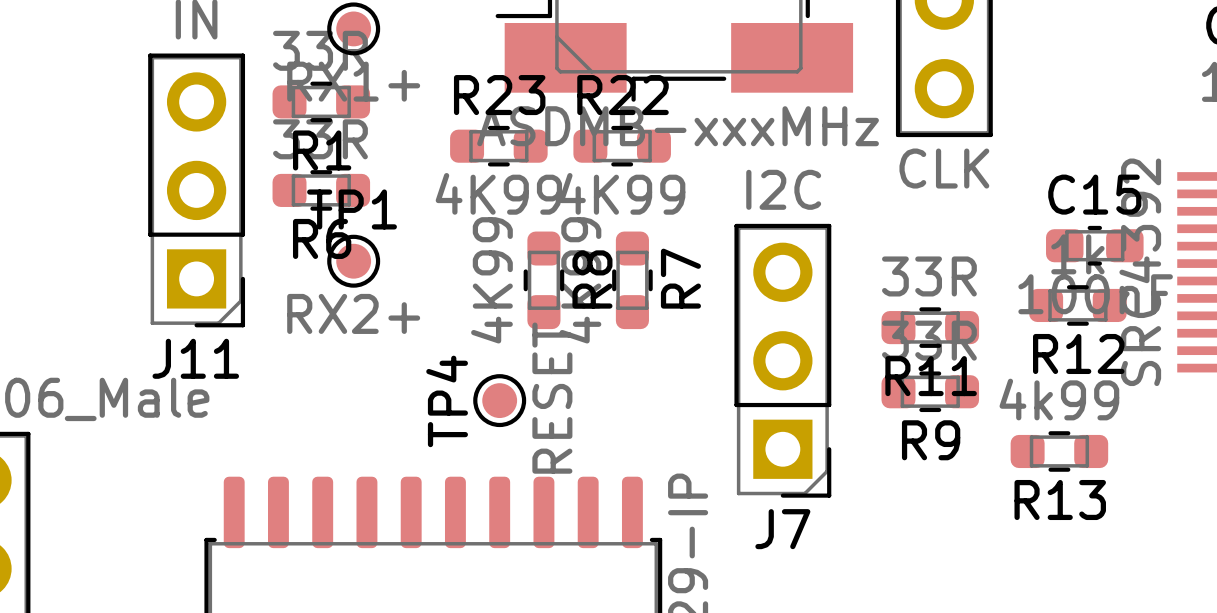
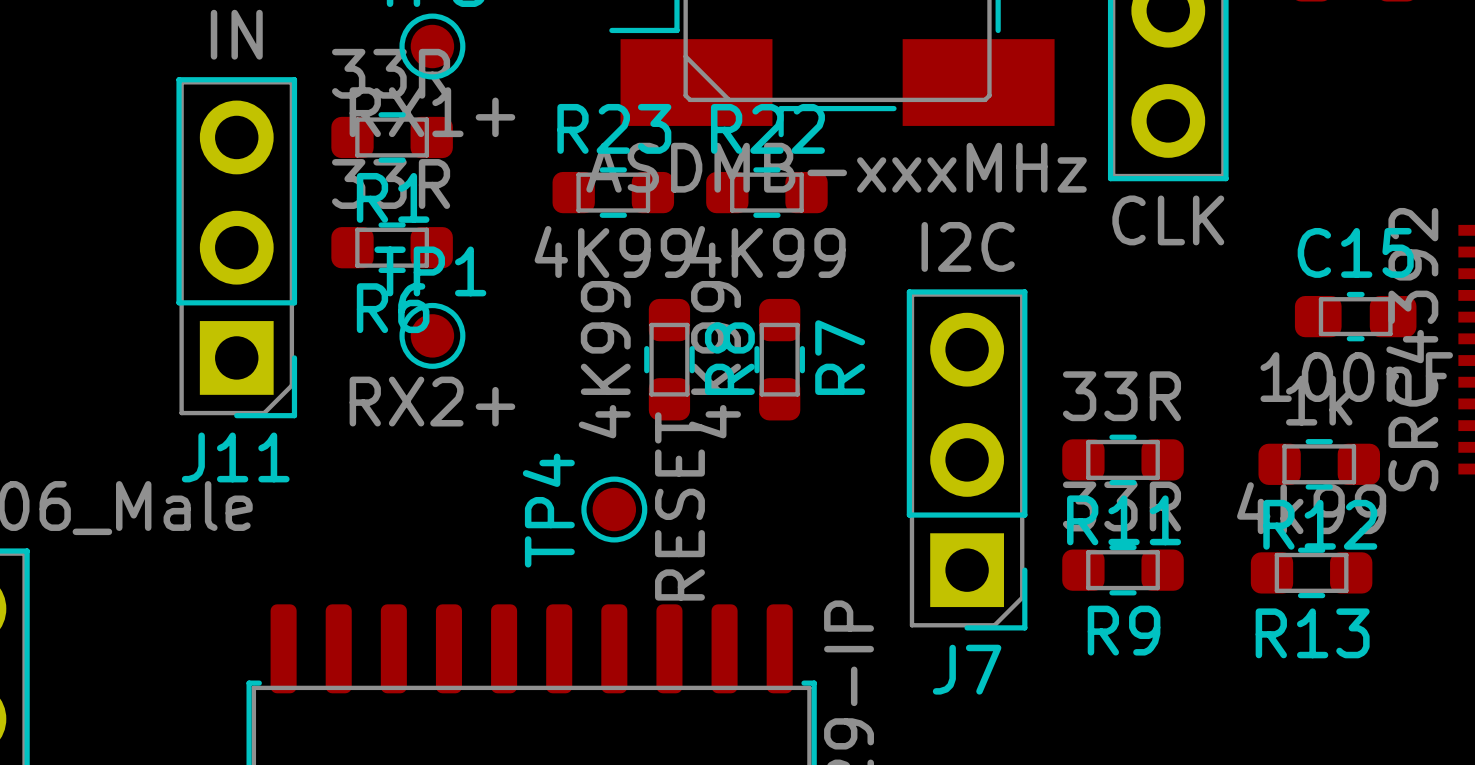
R12 position: (1077, 305) -> (1319, 464)
R11 position: (930, 327) -> (1123, 459)
R9 position: (930, 391) -> (1123, 570)

